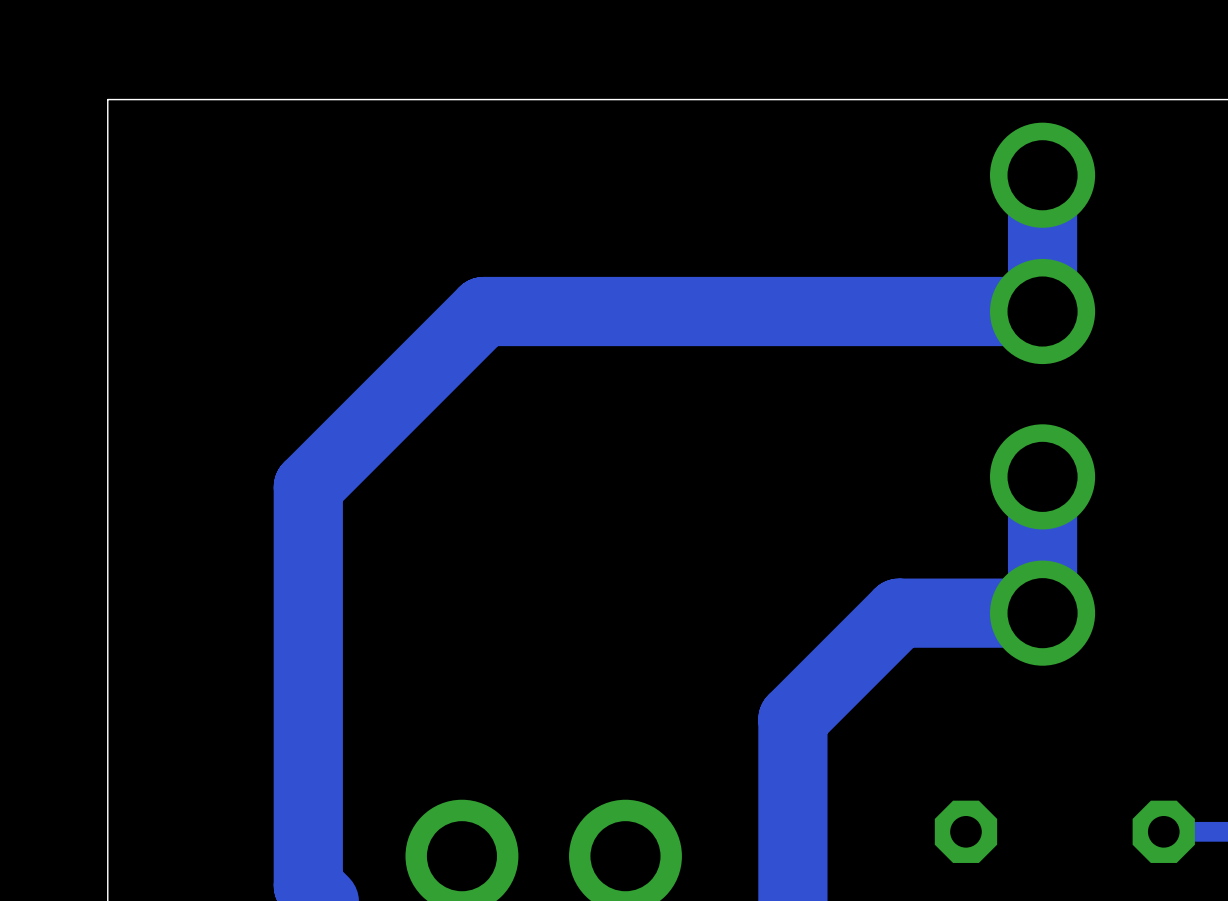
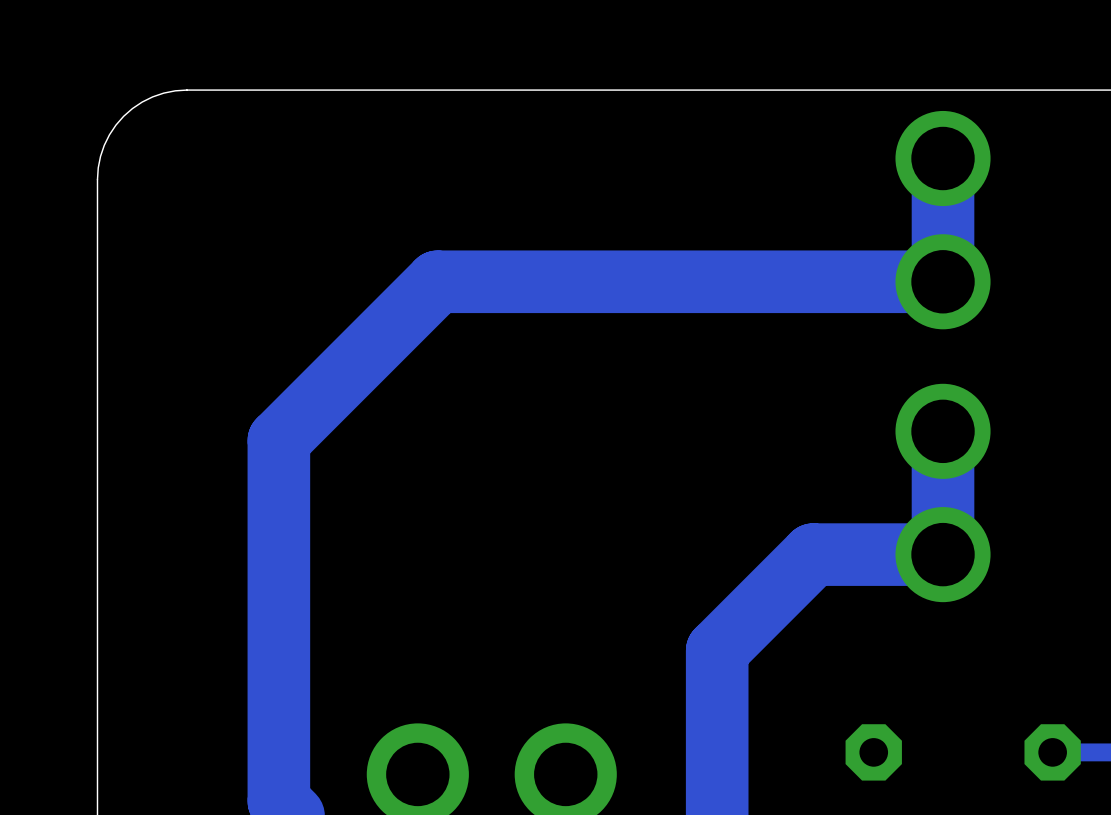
board edge: (206, 99) (107, 99) (107, 198) -> (186, 90) (163, 93) (152, 96) (132, 108) (123, 116) (115, 125) (104, 145) (100, 156) (97, 179)

